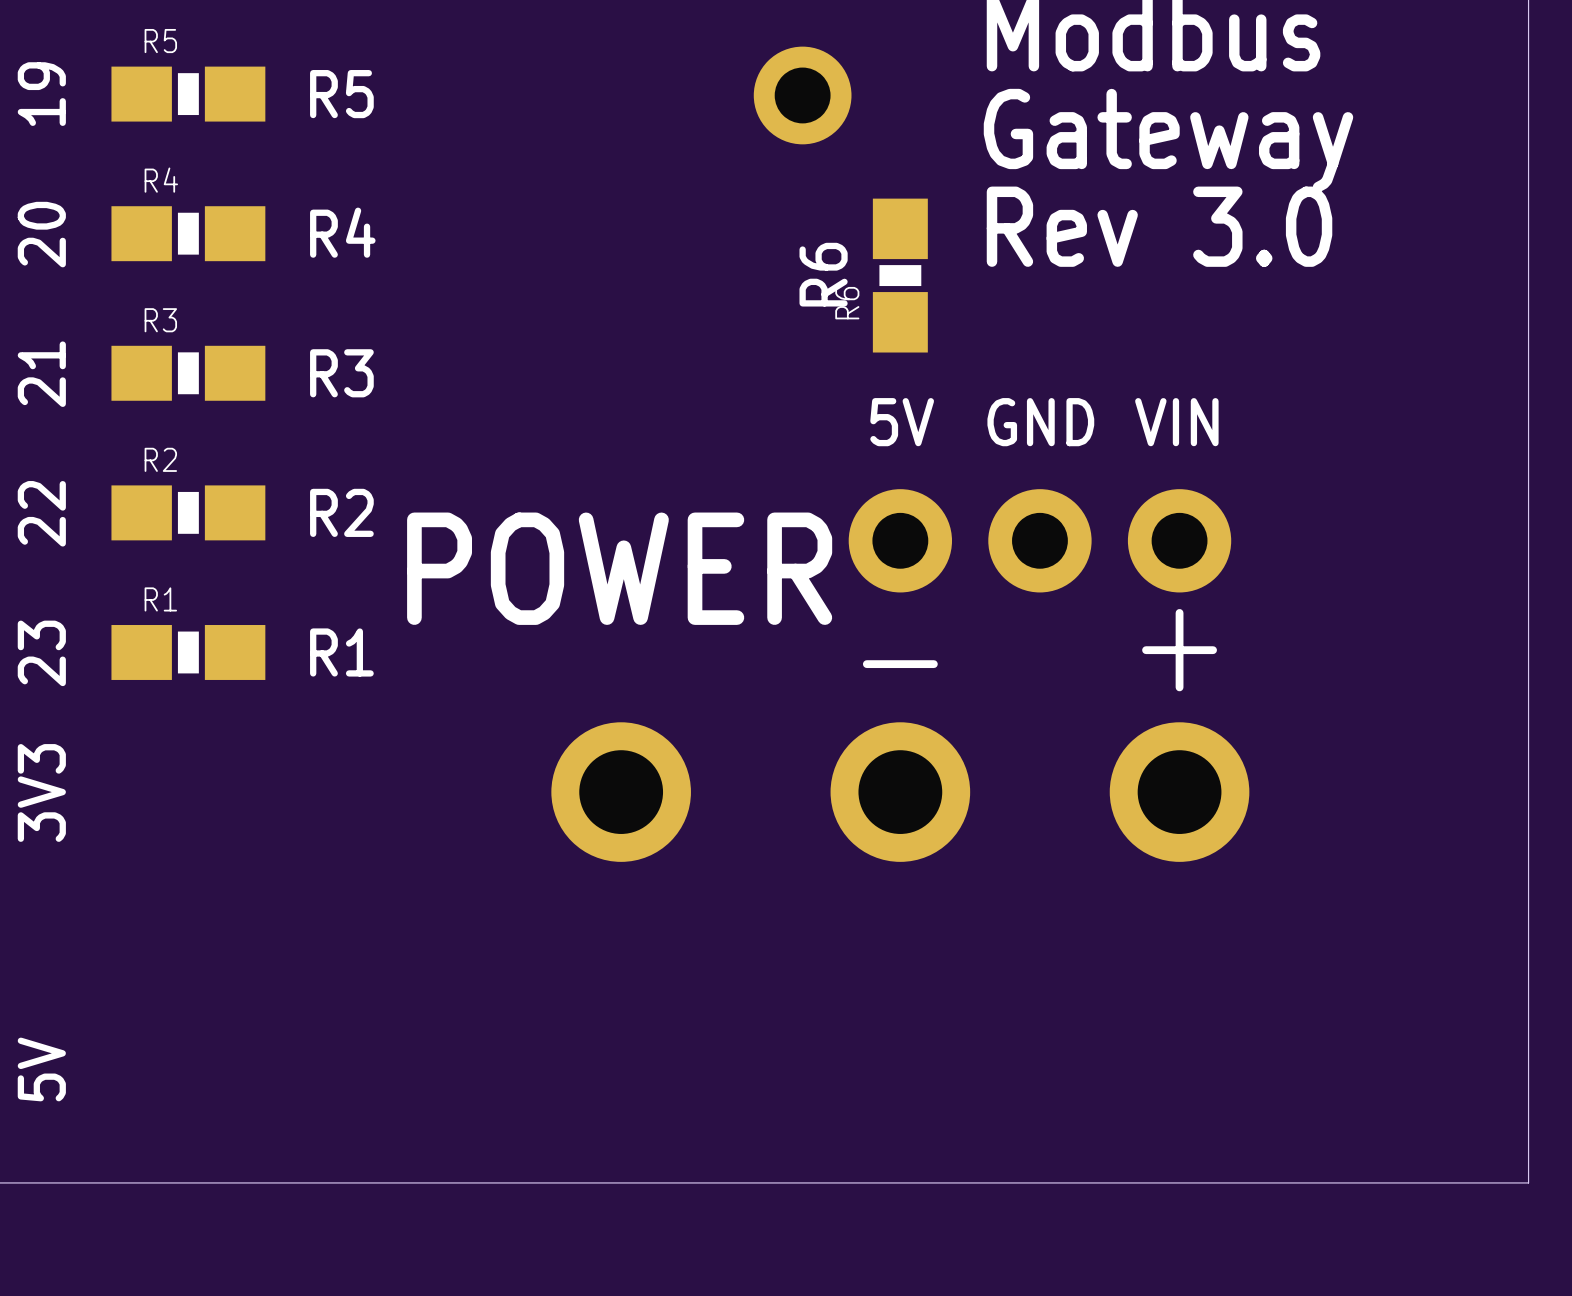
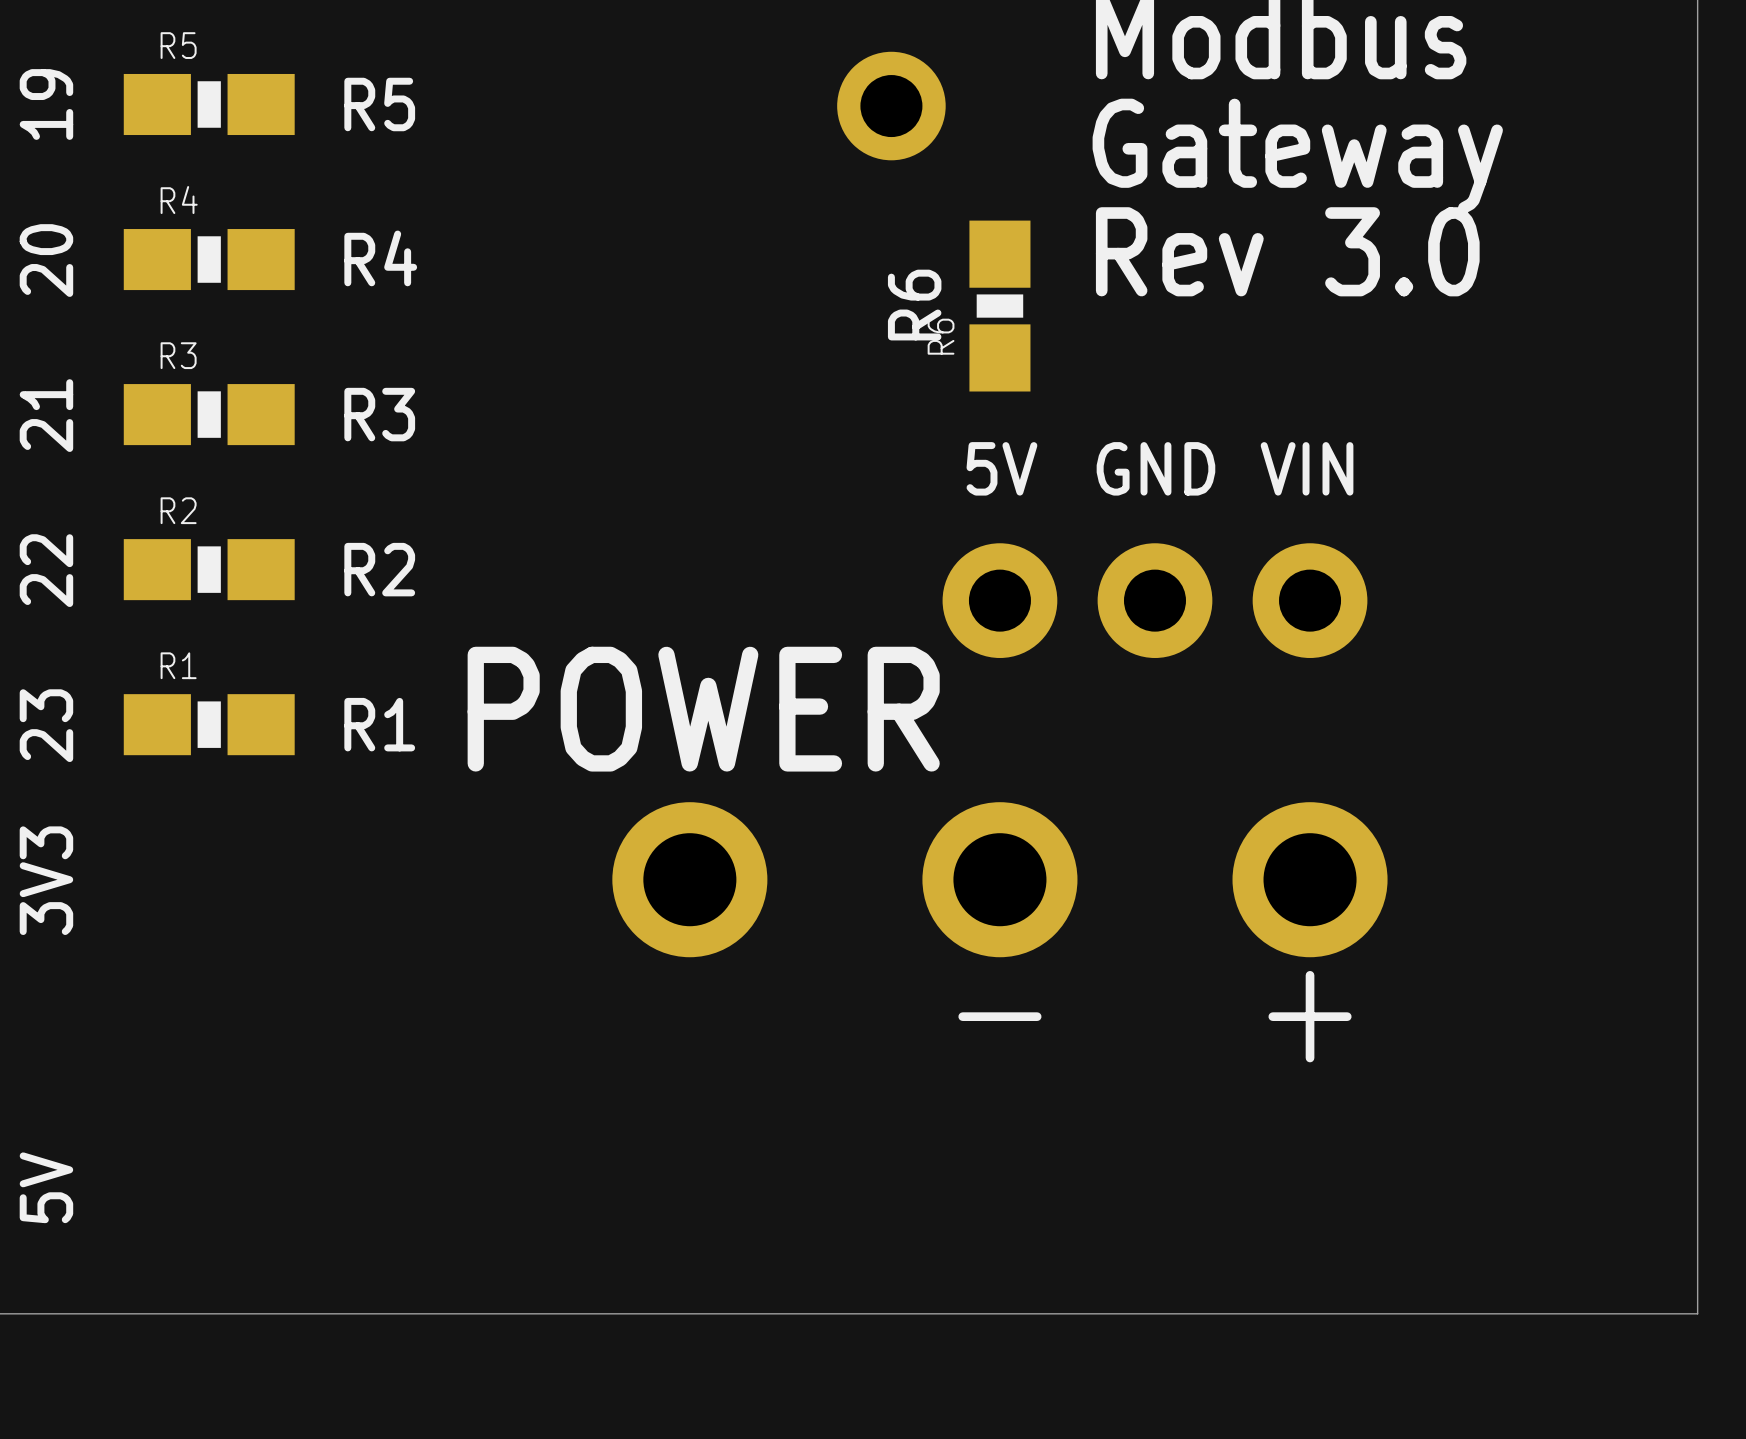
text position: POWER (619, 568) -> POWER (703, 709)
text position: + (1179, 650) -> + (1310, 1016)
text position: - (900, 664) -> - (999, 1016)

